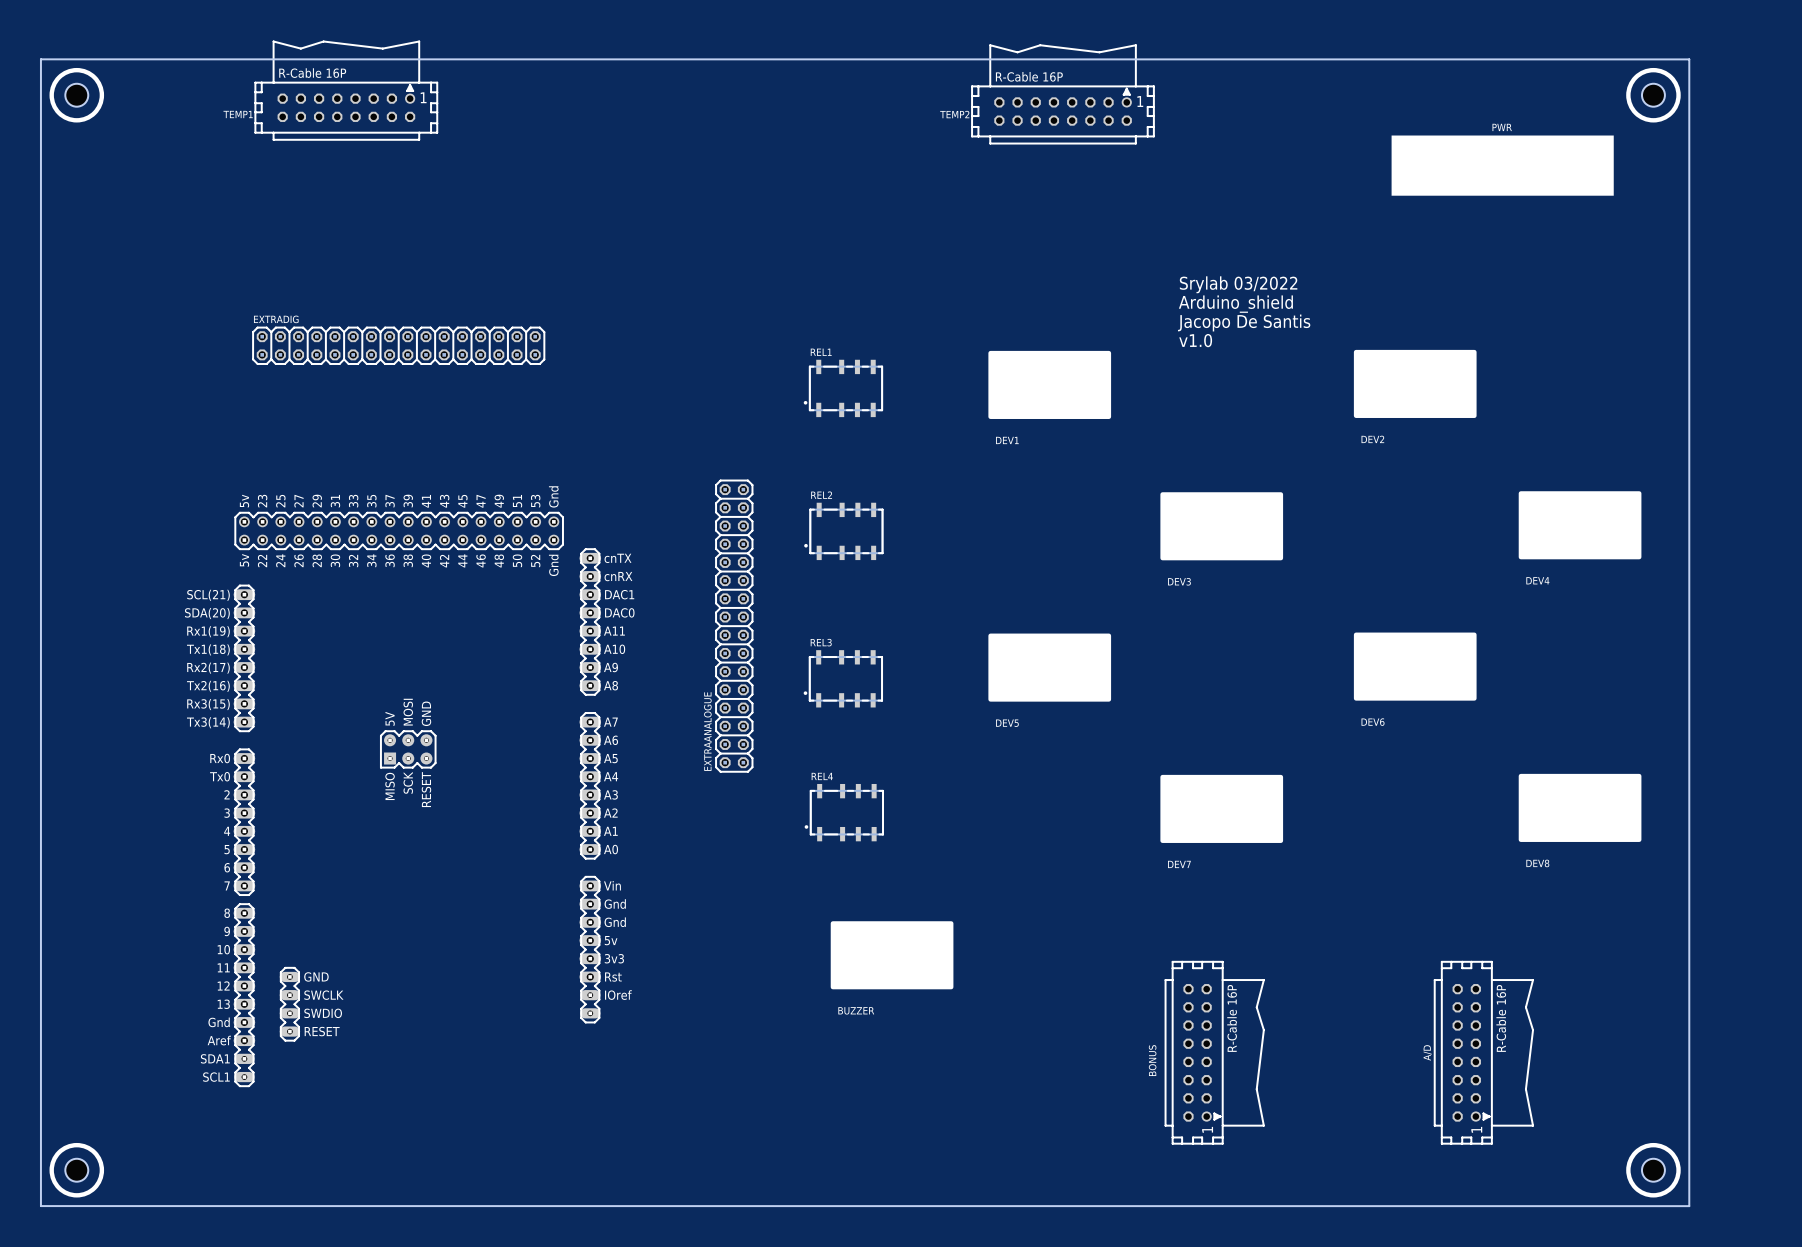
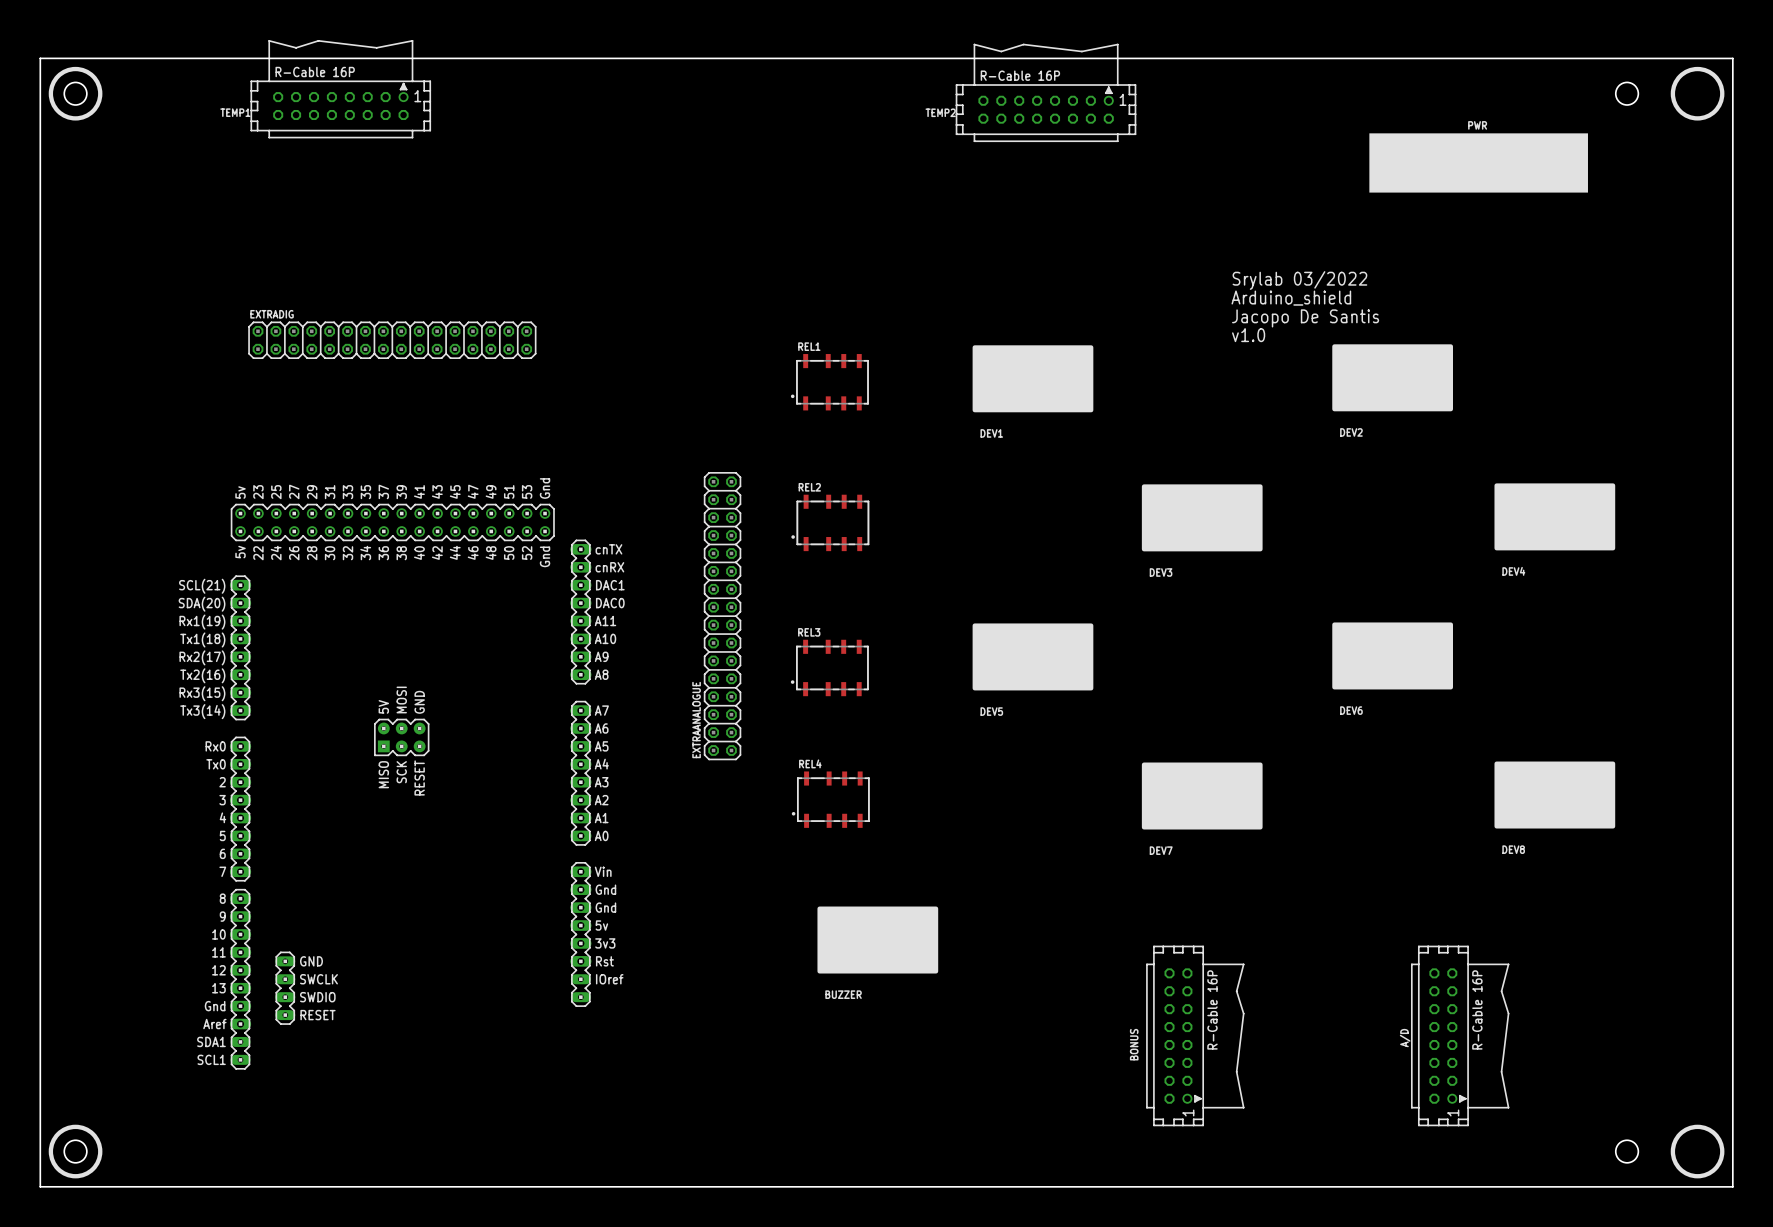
board edge: (1689, 59) (1689, 1206) (40, 1206) -> (1662, 58) (1732, 58) (1732, 1186) (40, 1186)
drawing position: (1653, 95) -> (1697, 93)
text position: Srylab 03/2022 (1238, 284) -> Srylab 03/2022 (1299, 280)
text position: Arduino_shield (1235, 304) -> Arduino_shield (1291, 298)
text position: Jacopo De Santis (1244, 323) -> Jacopo De Santis (1305, 318)
text position: v1.0 (1195, 340) -> v1.0 (1248, 335)
drawing position: (1653, 1170) -> (1697, 1151)

